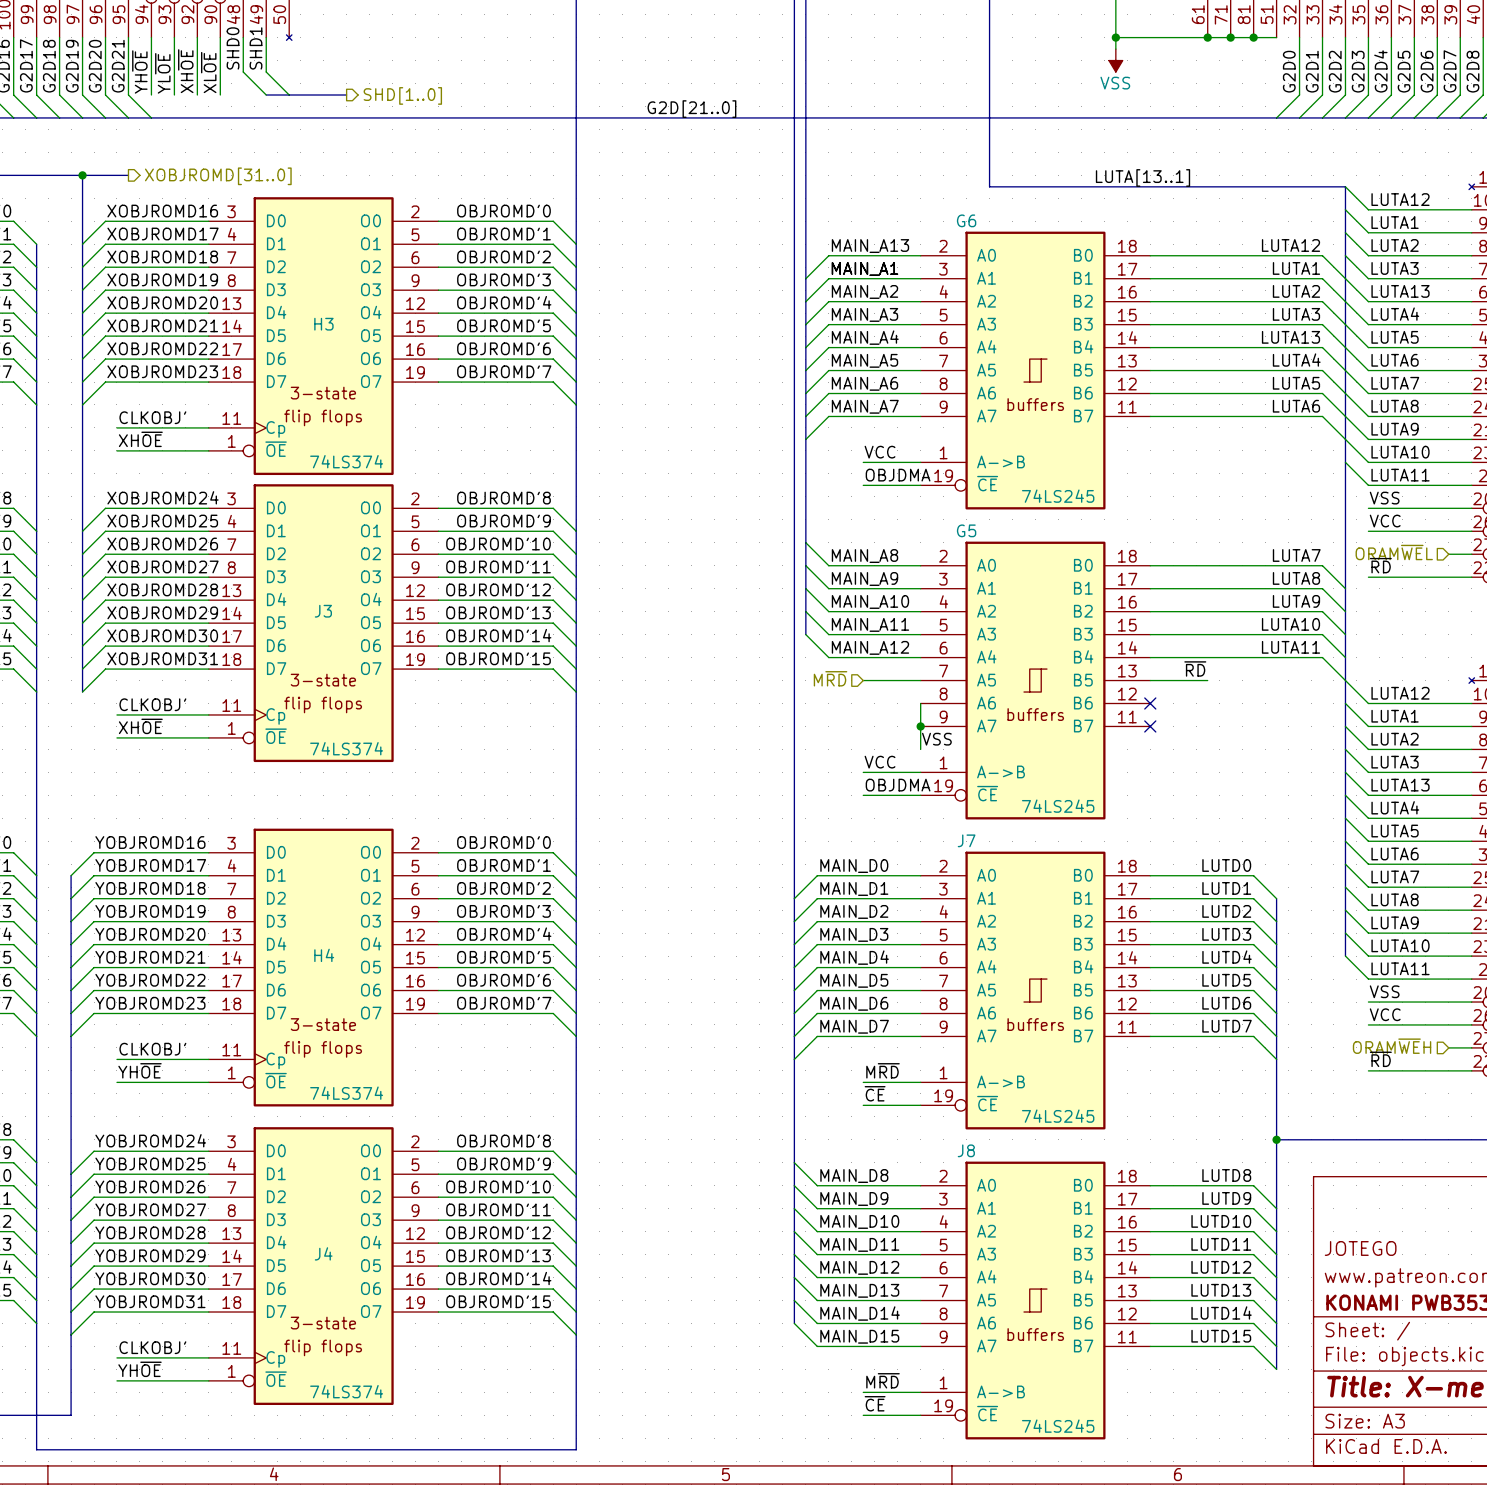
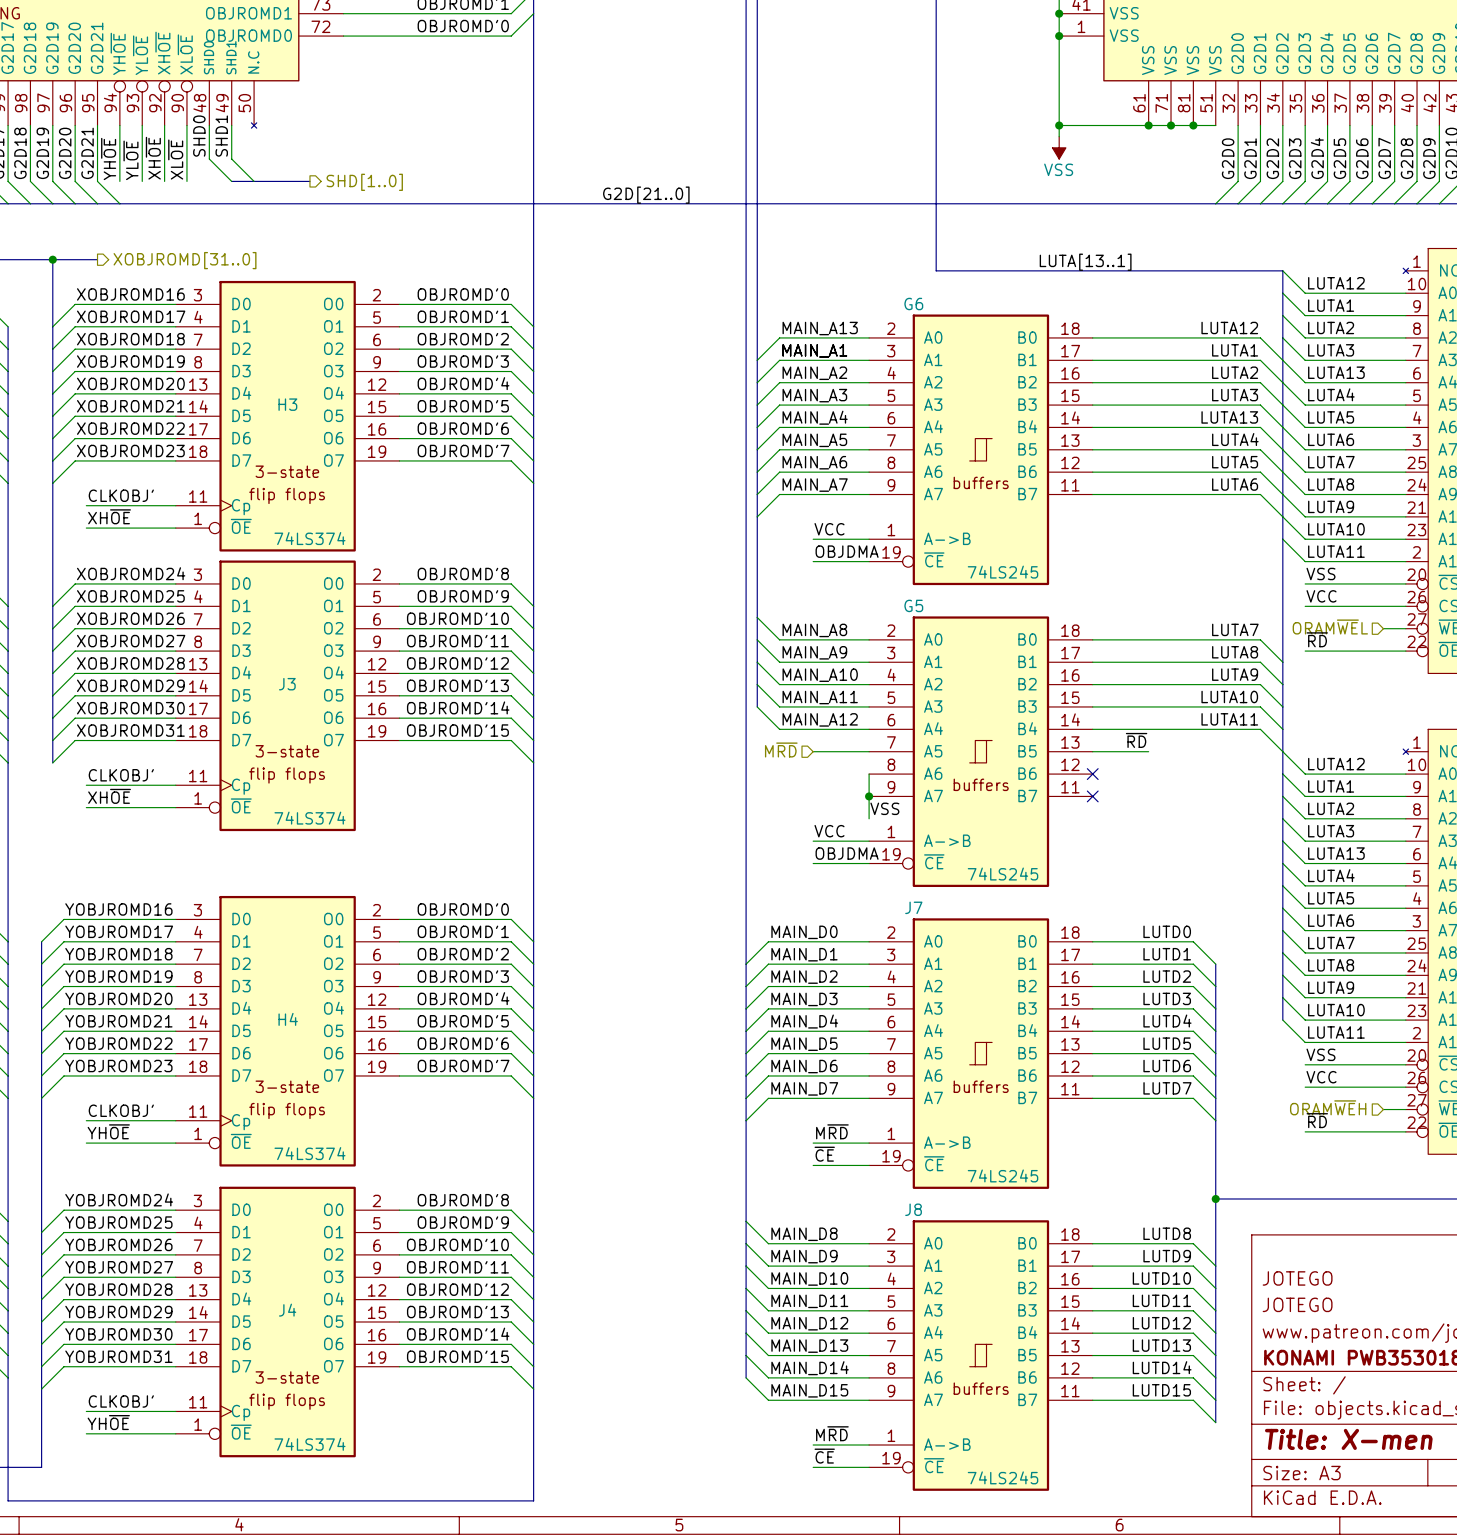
title block: none -> JOTEGO (1297, 1278)

